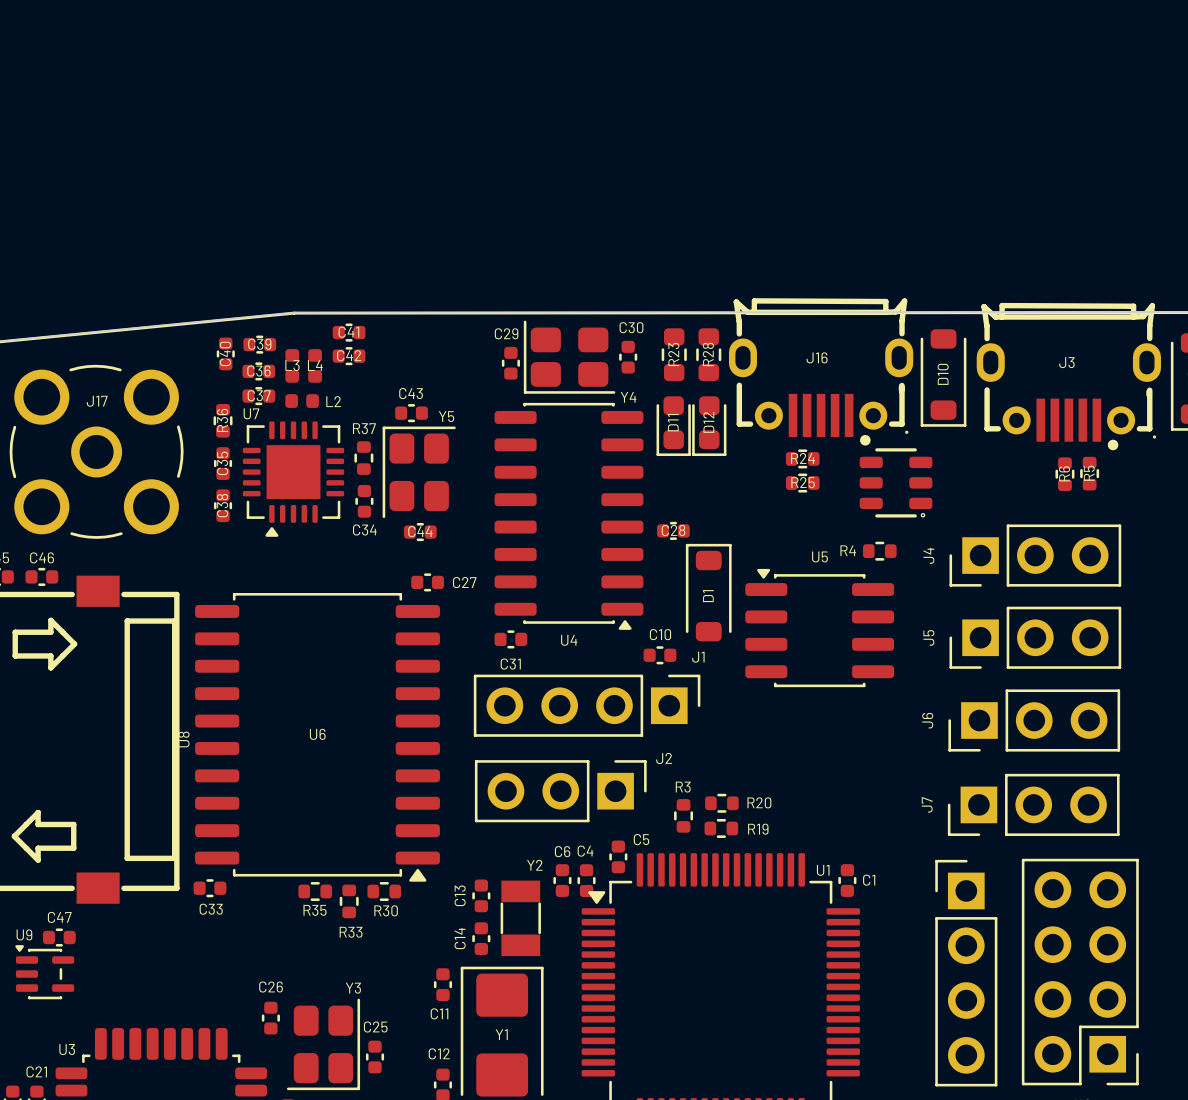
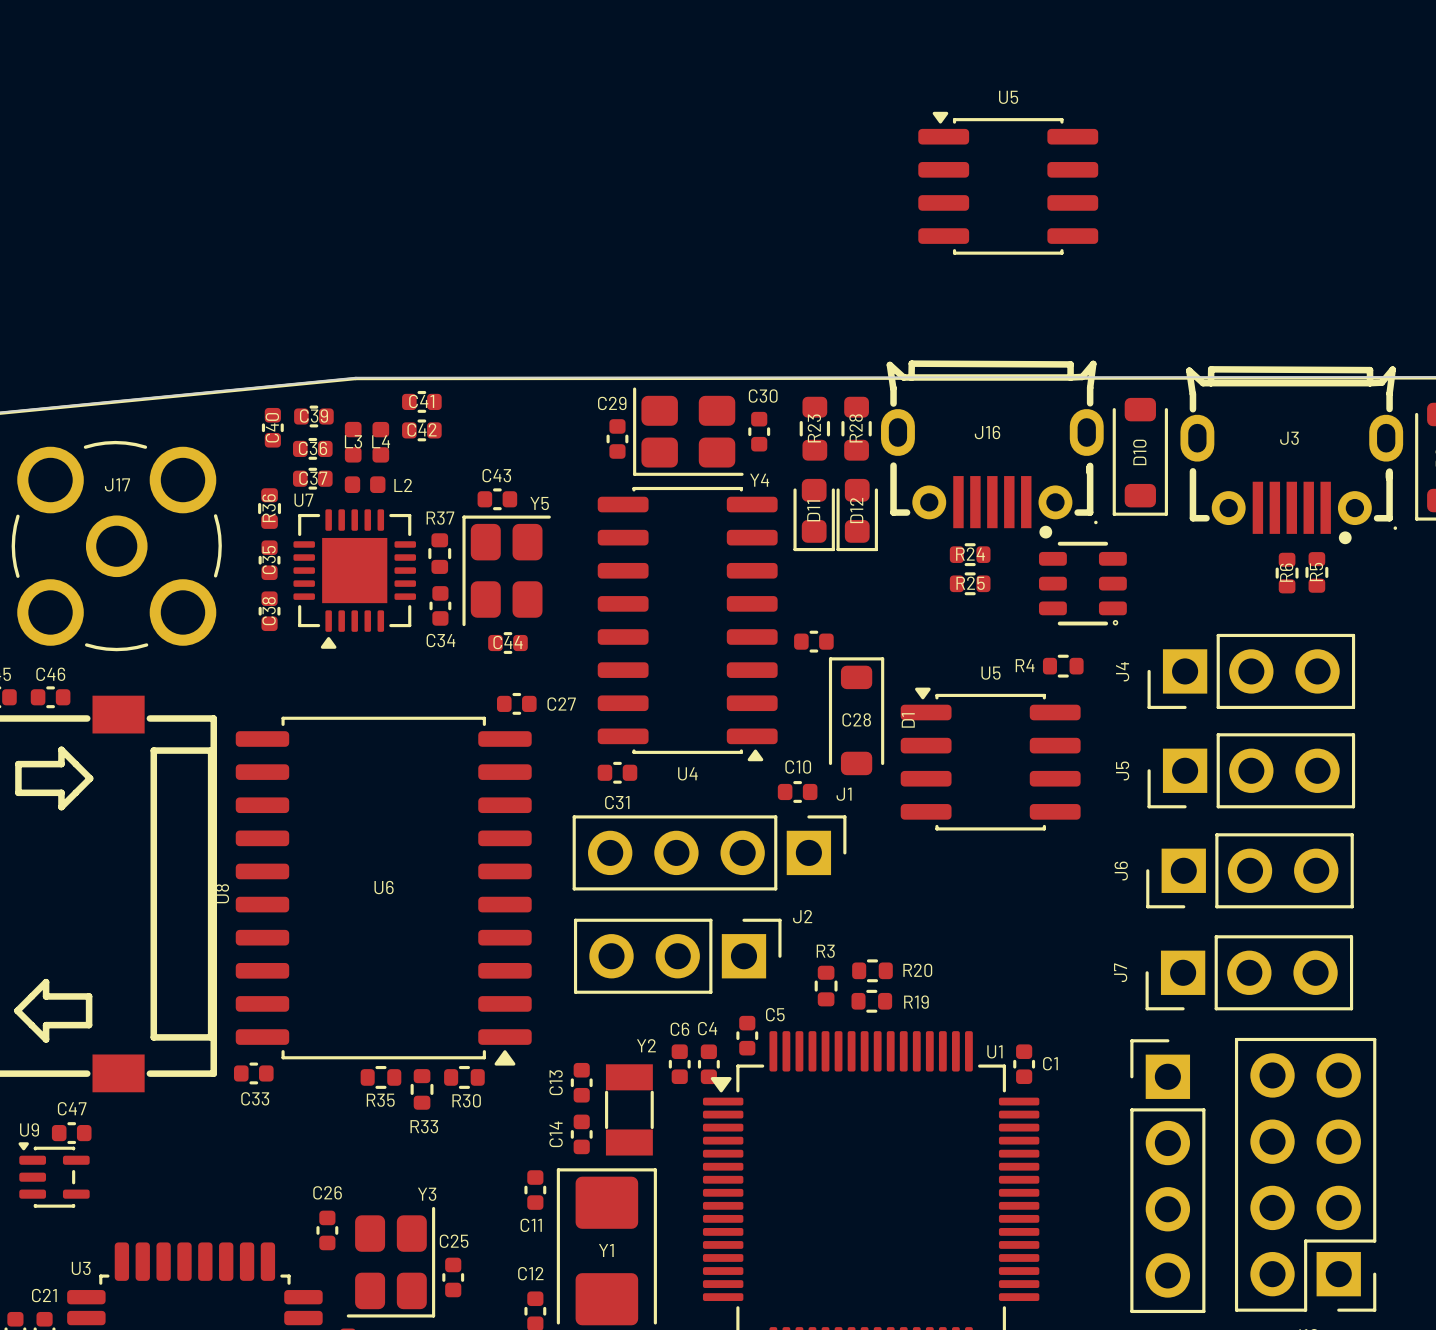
U5: none -> (1008, 183)
C28 name position: C28 (673, 530) -> C28 (856, 719)
D1 name position: D1 (708, 596) -> D1 (908, 720)

